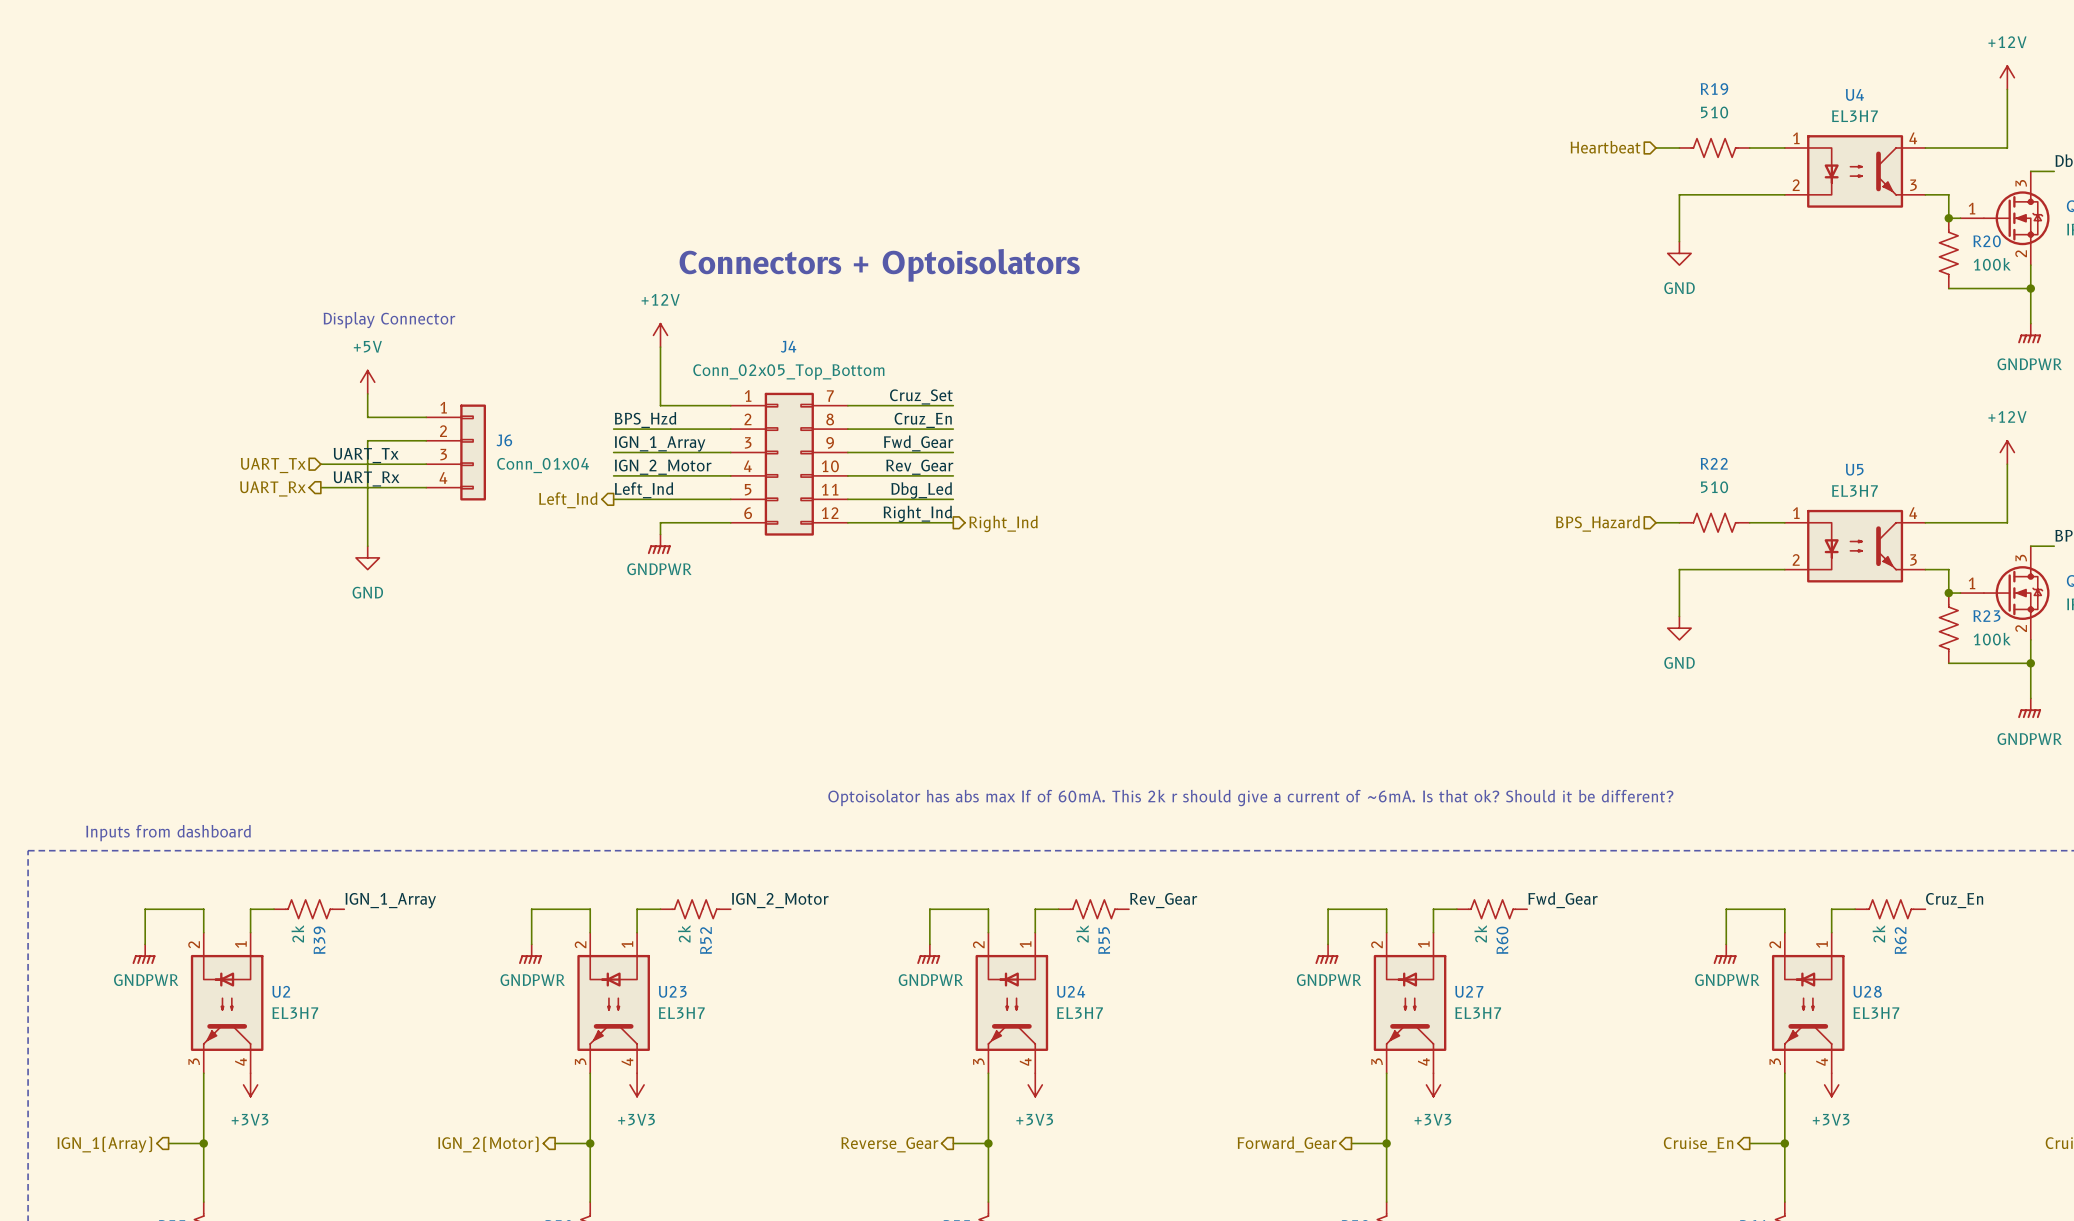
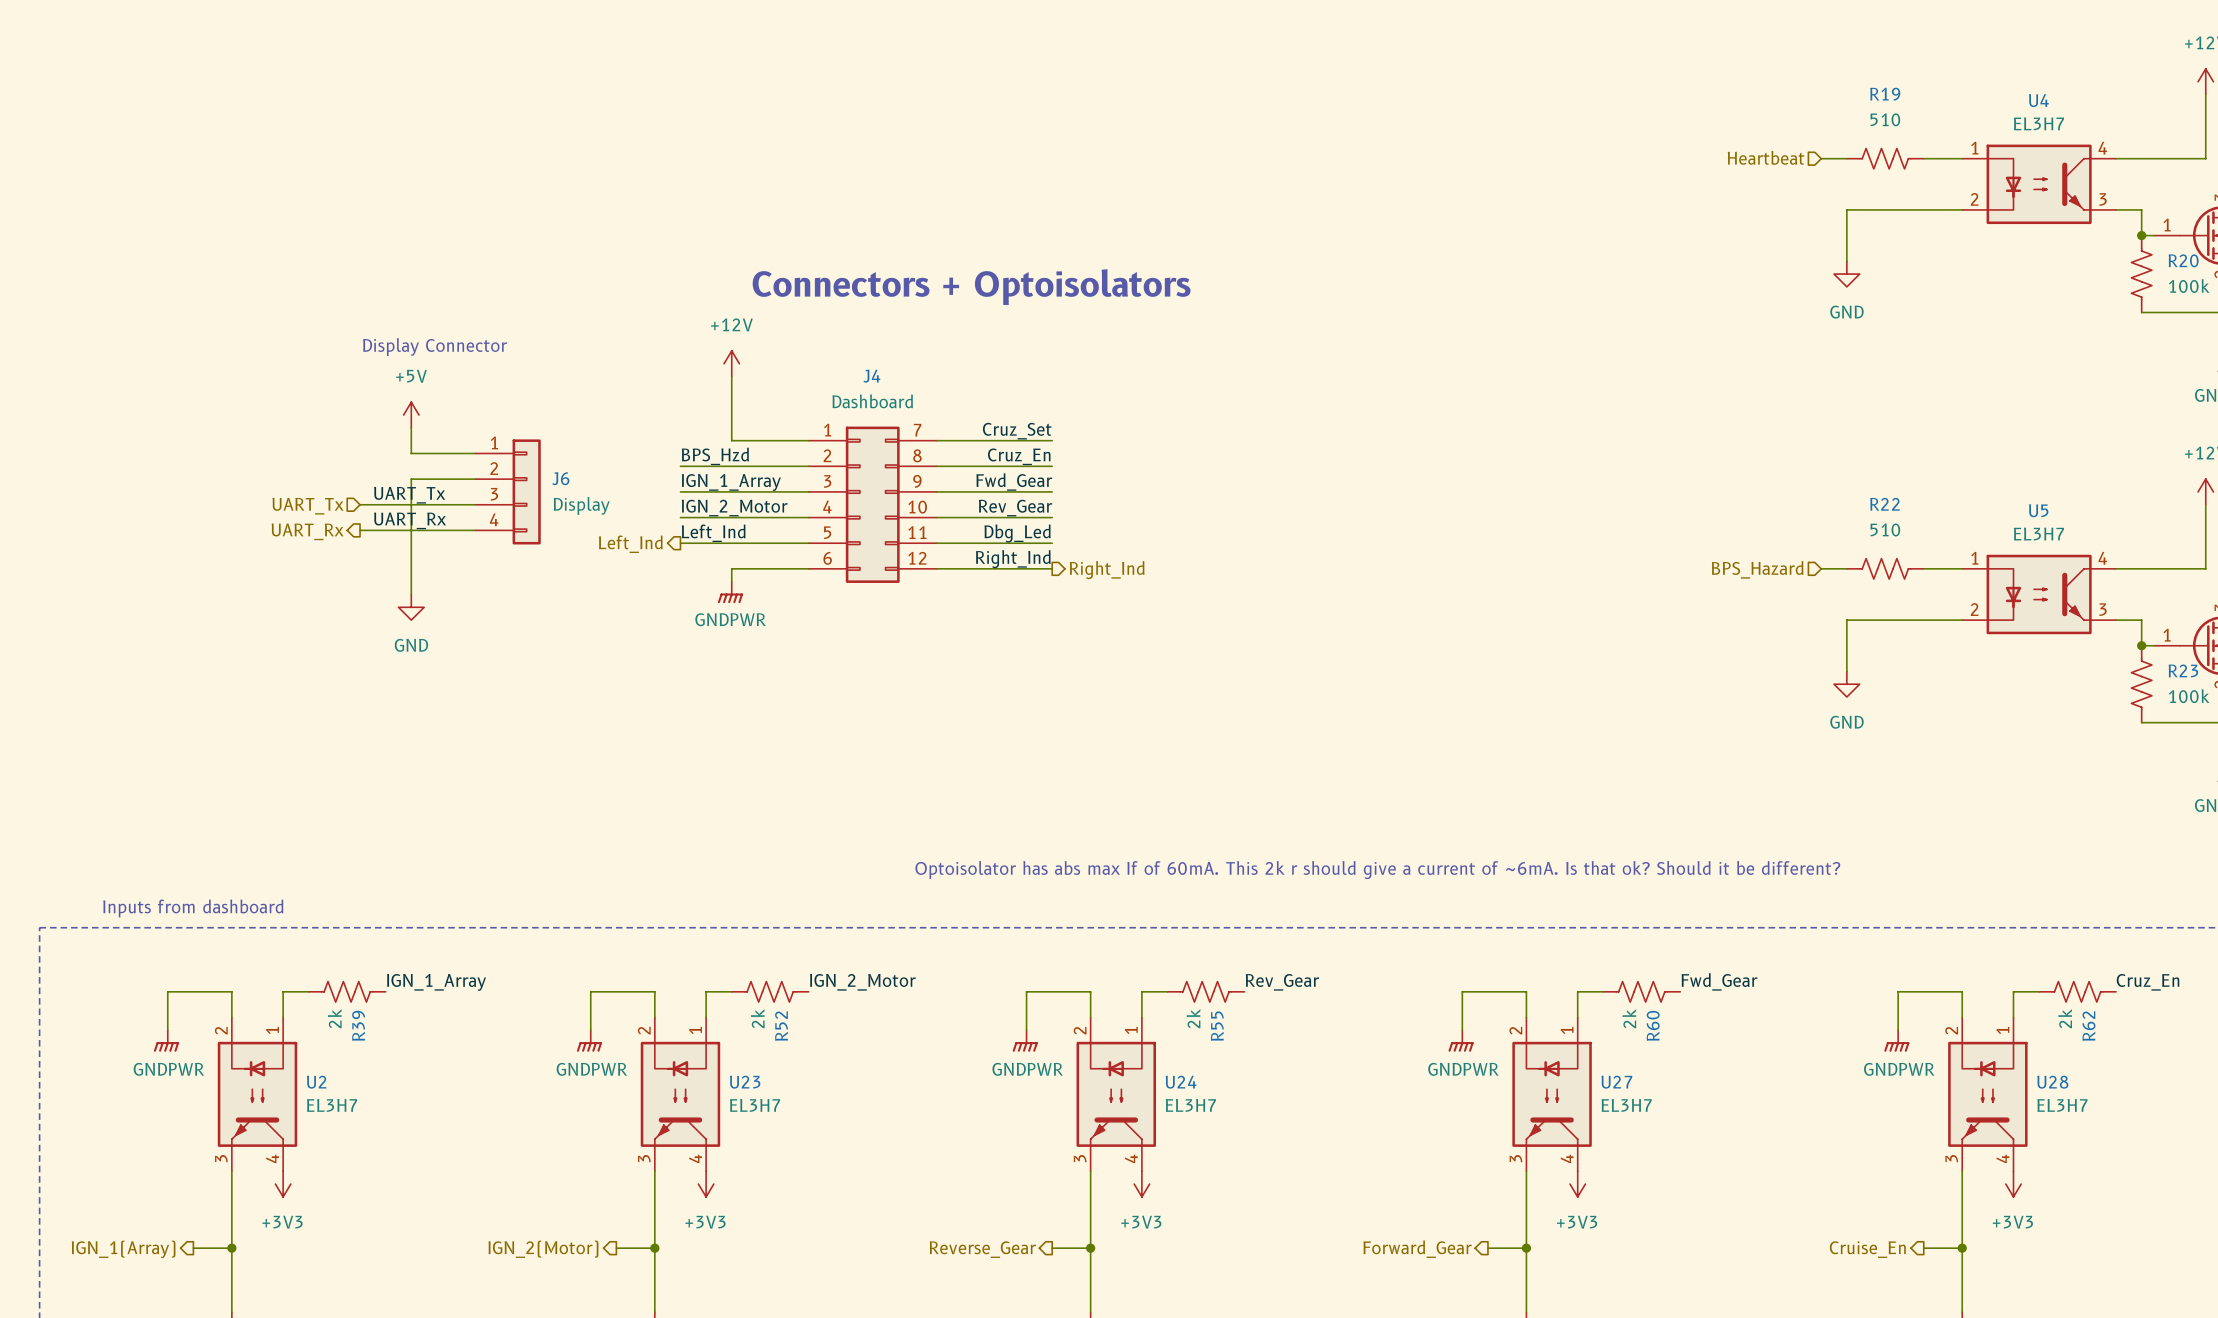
J4 value: Conn_02x05_Top_Bottom (788, 372) -> Dashboard (872, 401)
J6 value: Conn_01x04 (543, 465) -> Display (581, 505)

